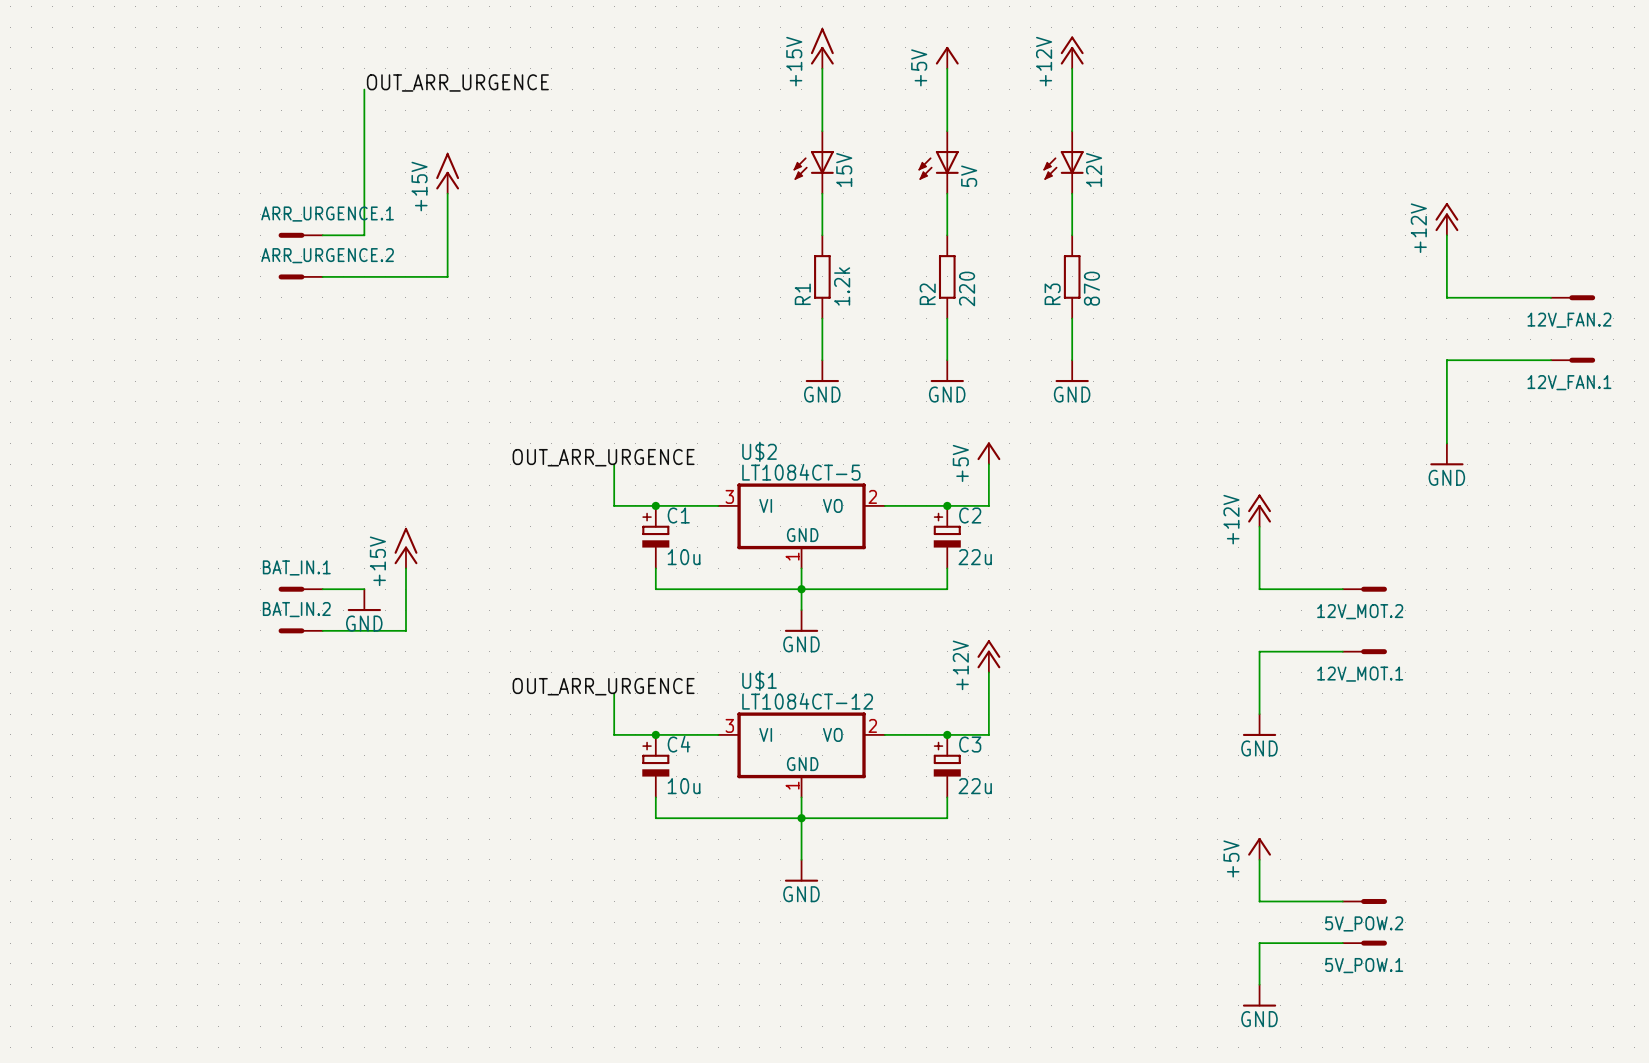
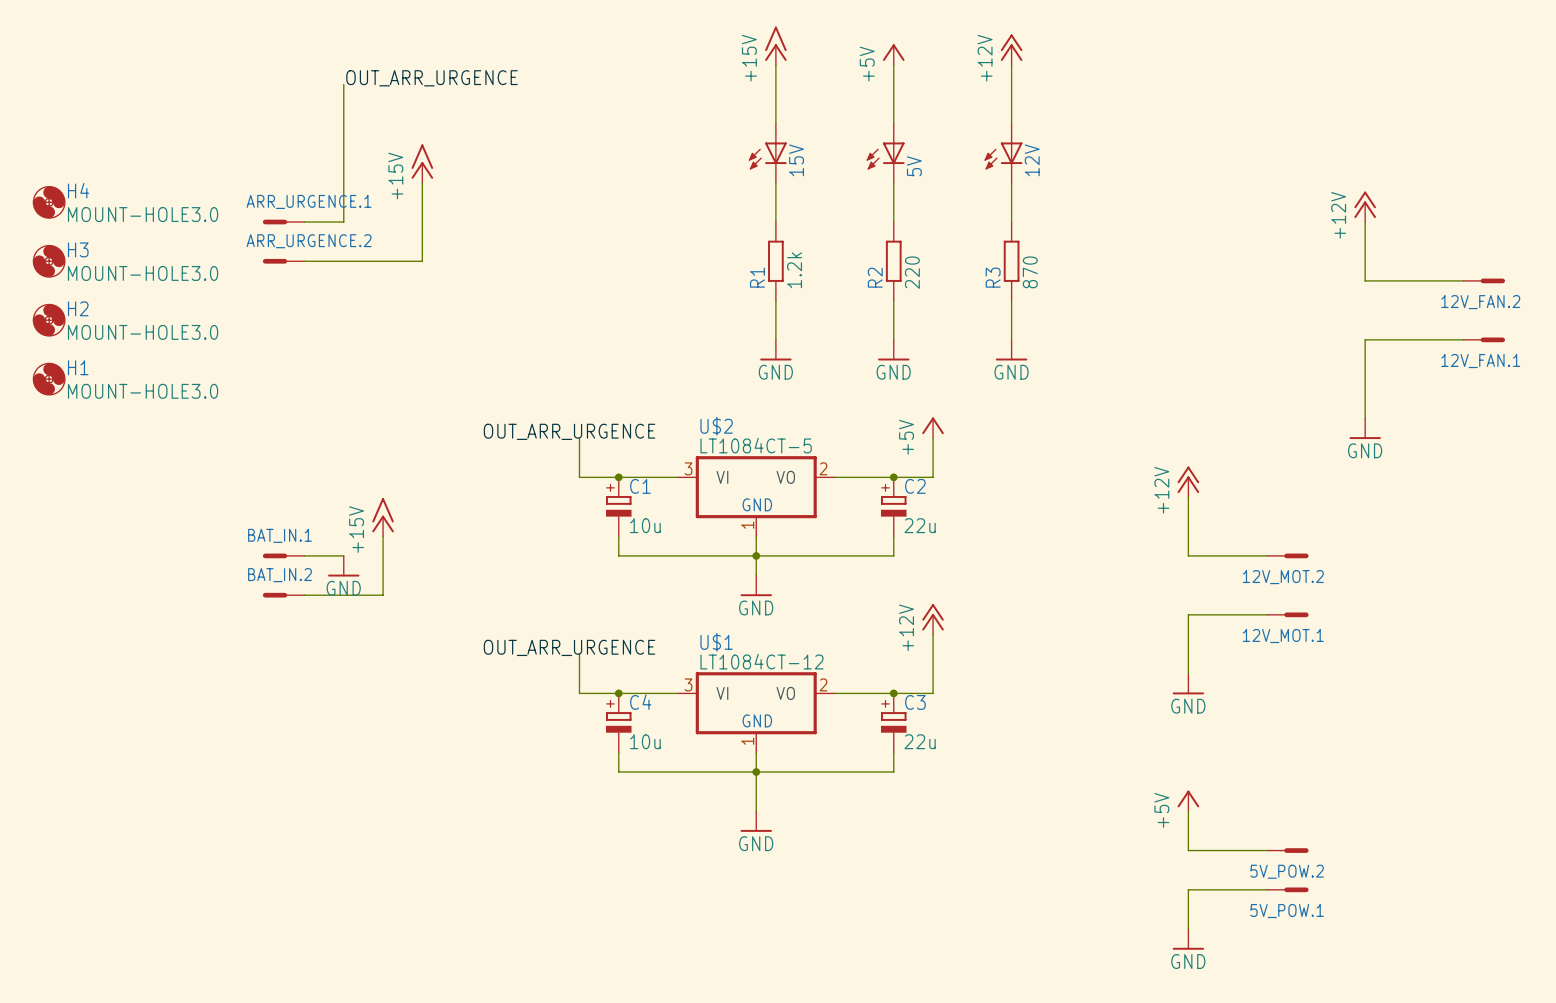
H4: none -> MOUNT-HOLE3.0 (49, 202)
H3: none -> MOUNT-HOLE3.0 (49, 261)
H2: none -> MOUNT-HOLE3.0 (49, 320)
H1: none -> MOUNT-HOLE3.0 (49, 379)

